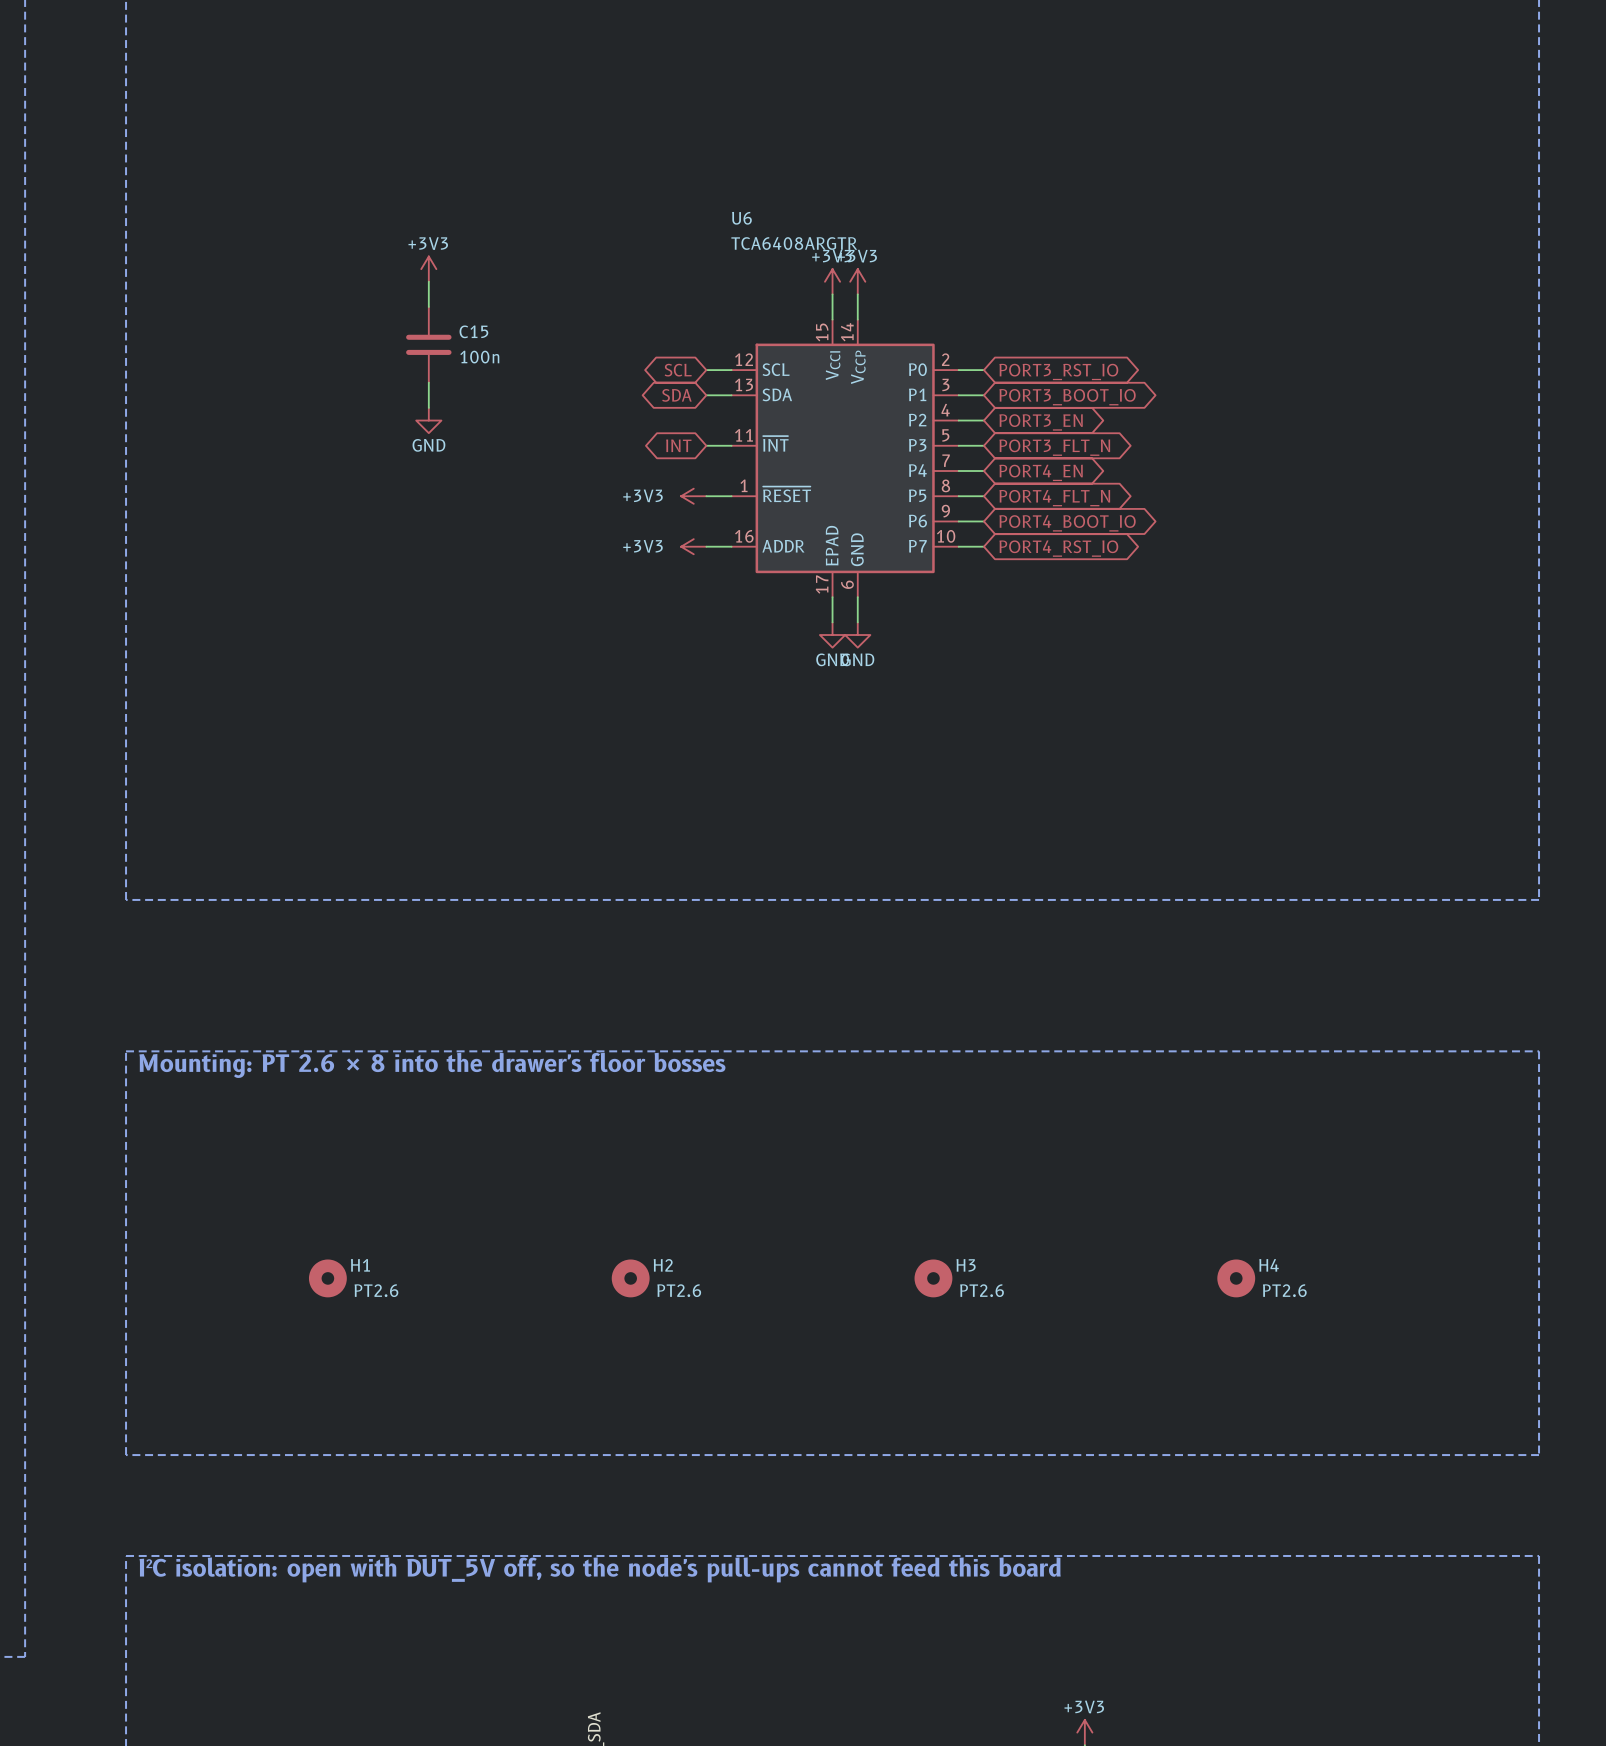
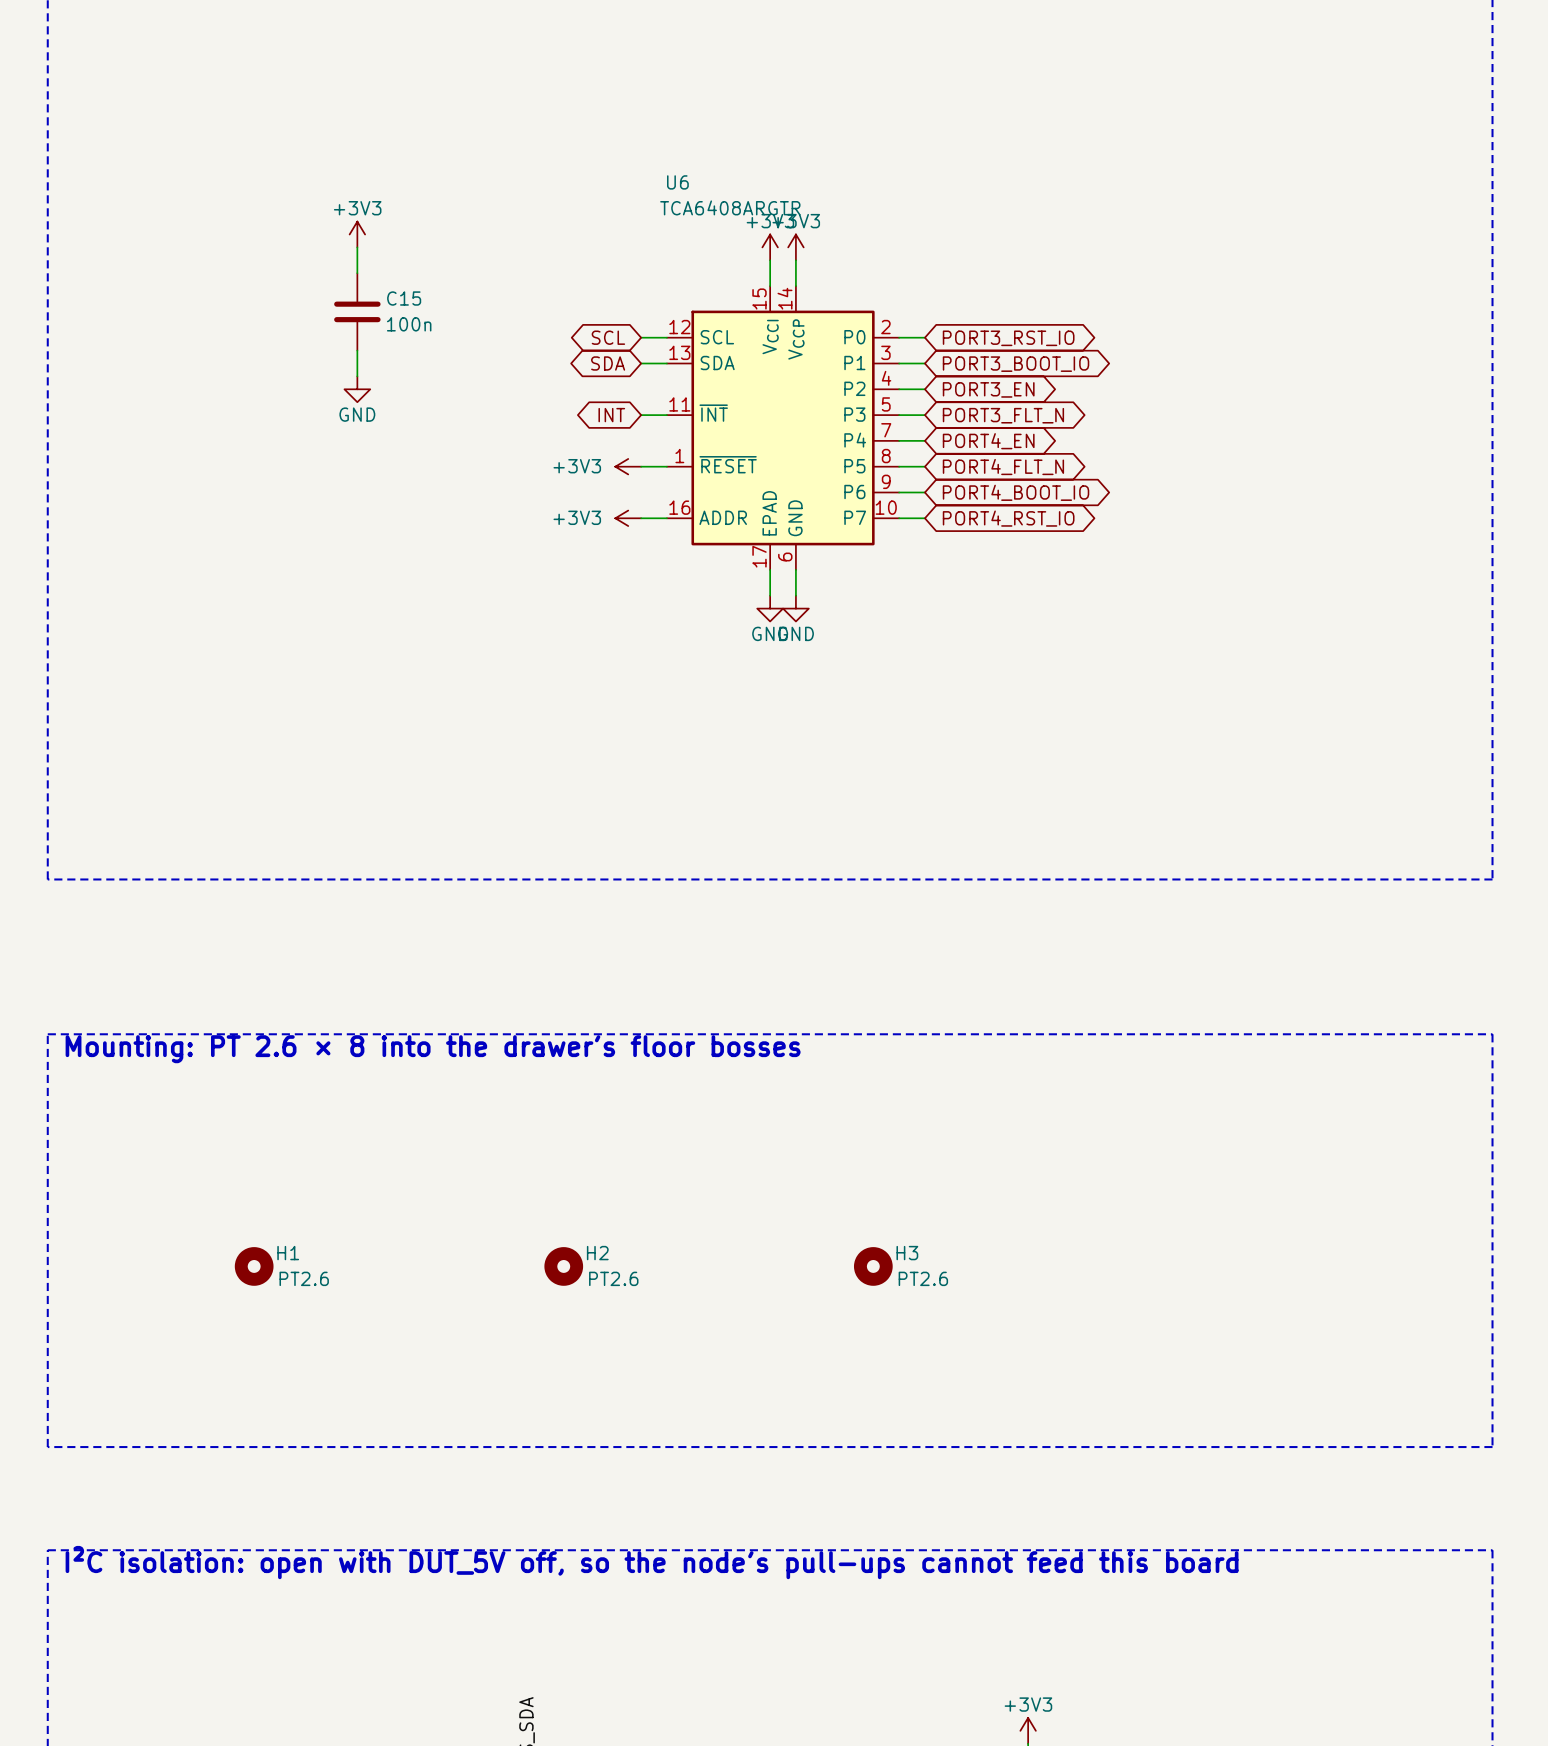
H4: PT2.6 (1236, 1278) -> none

